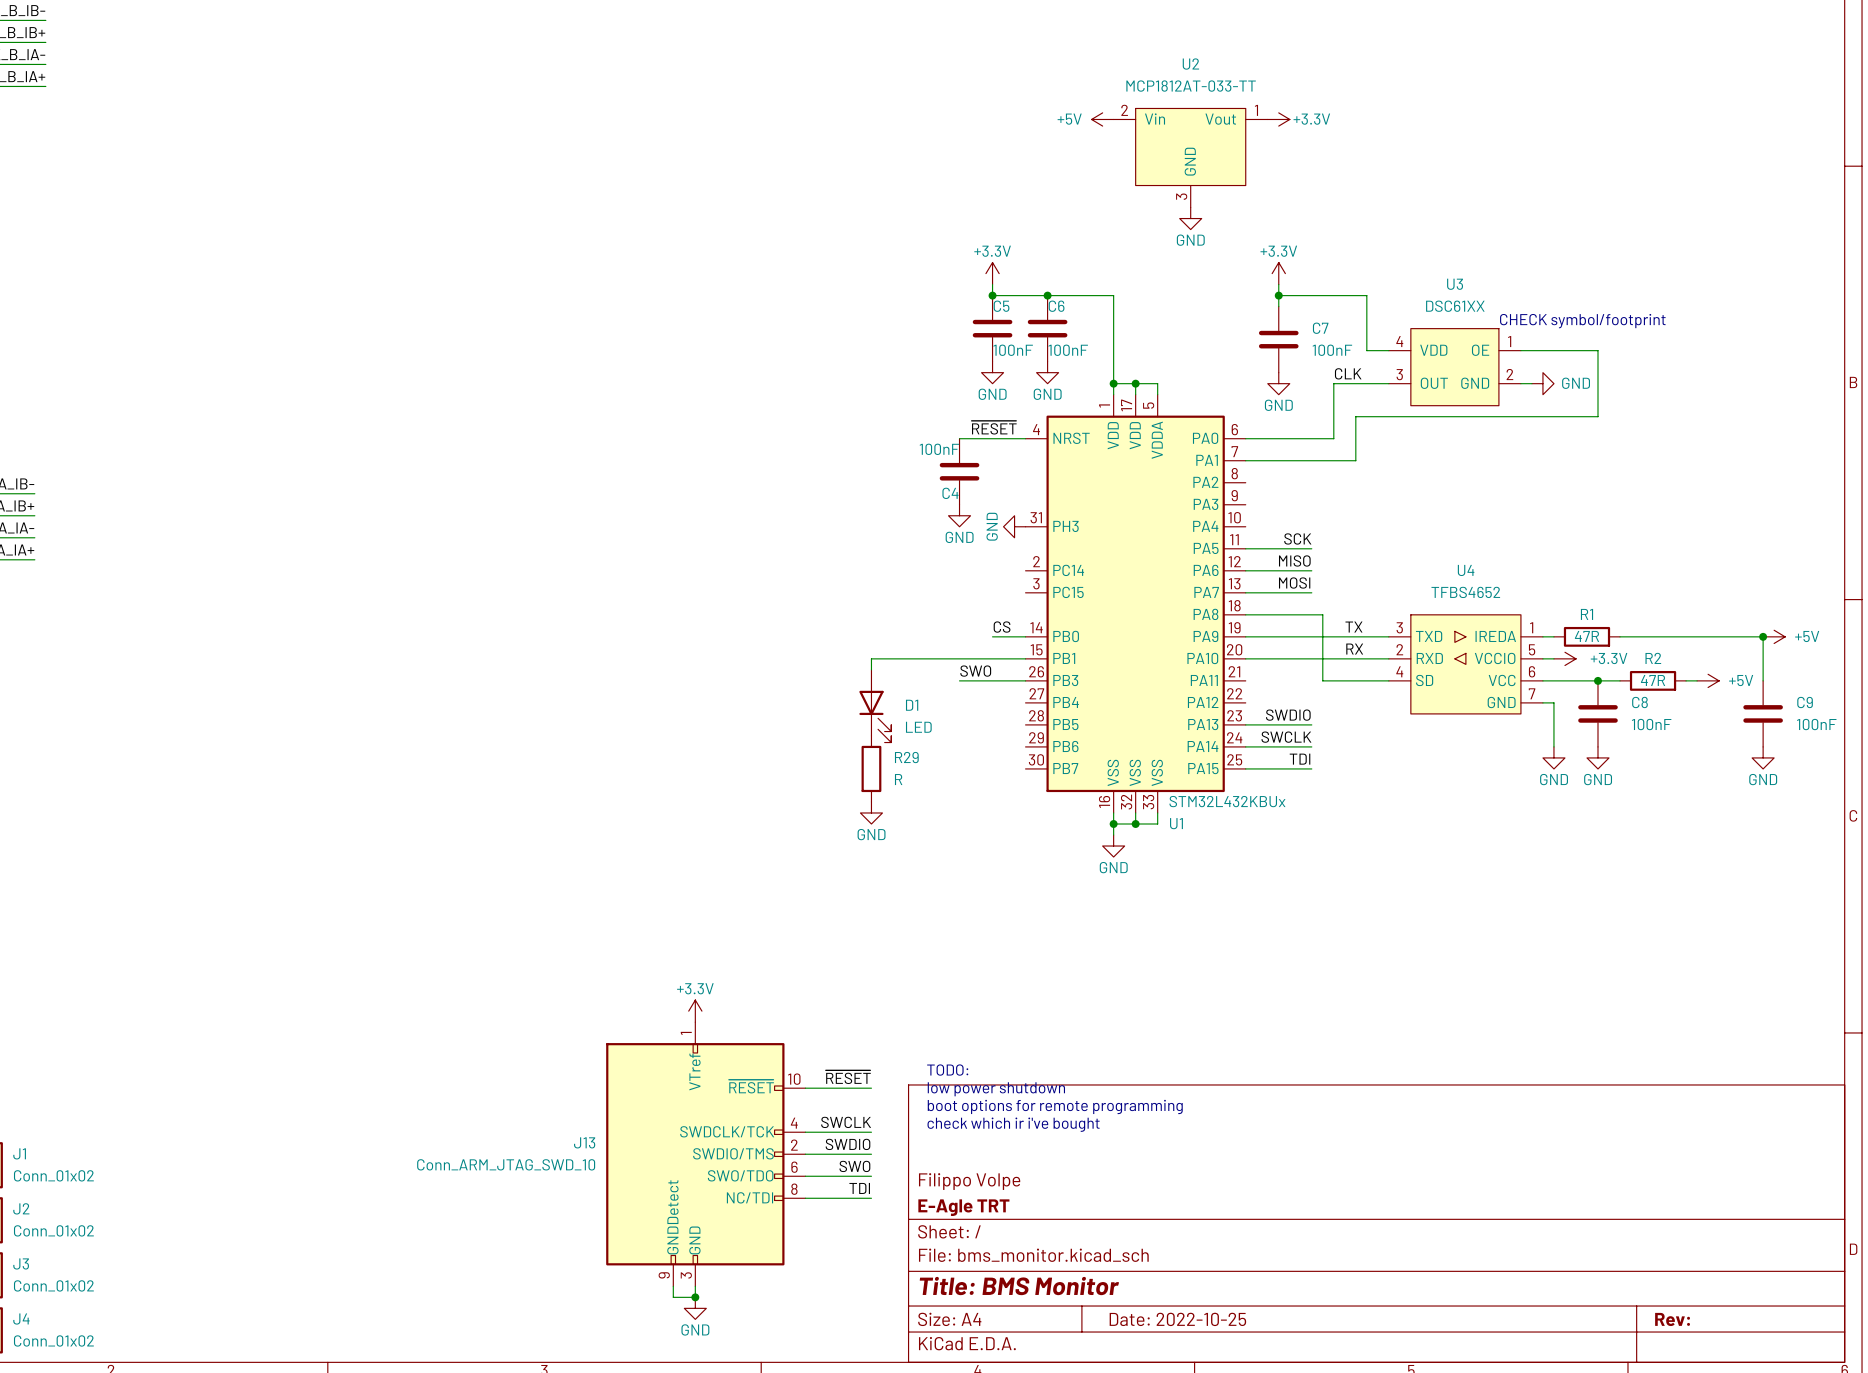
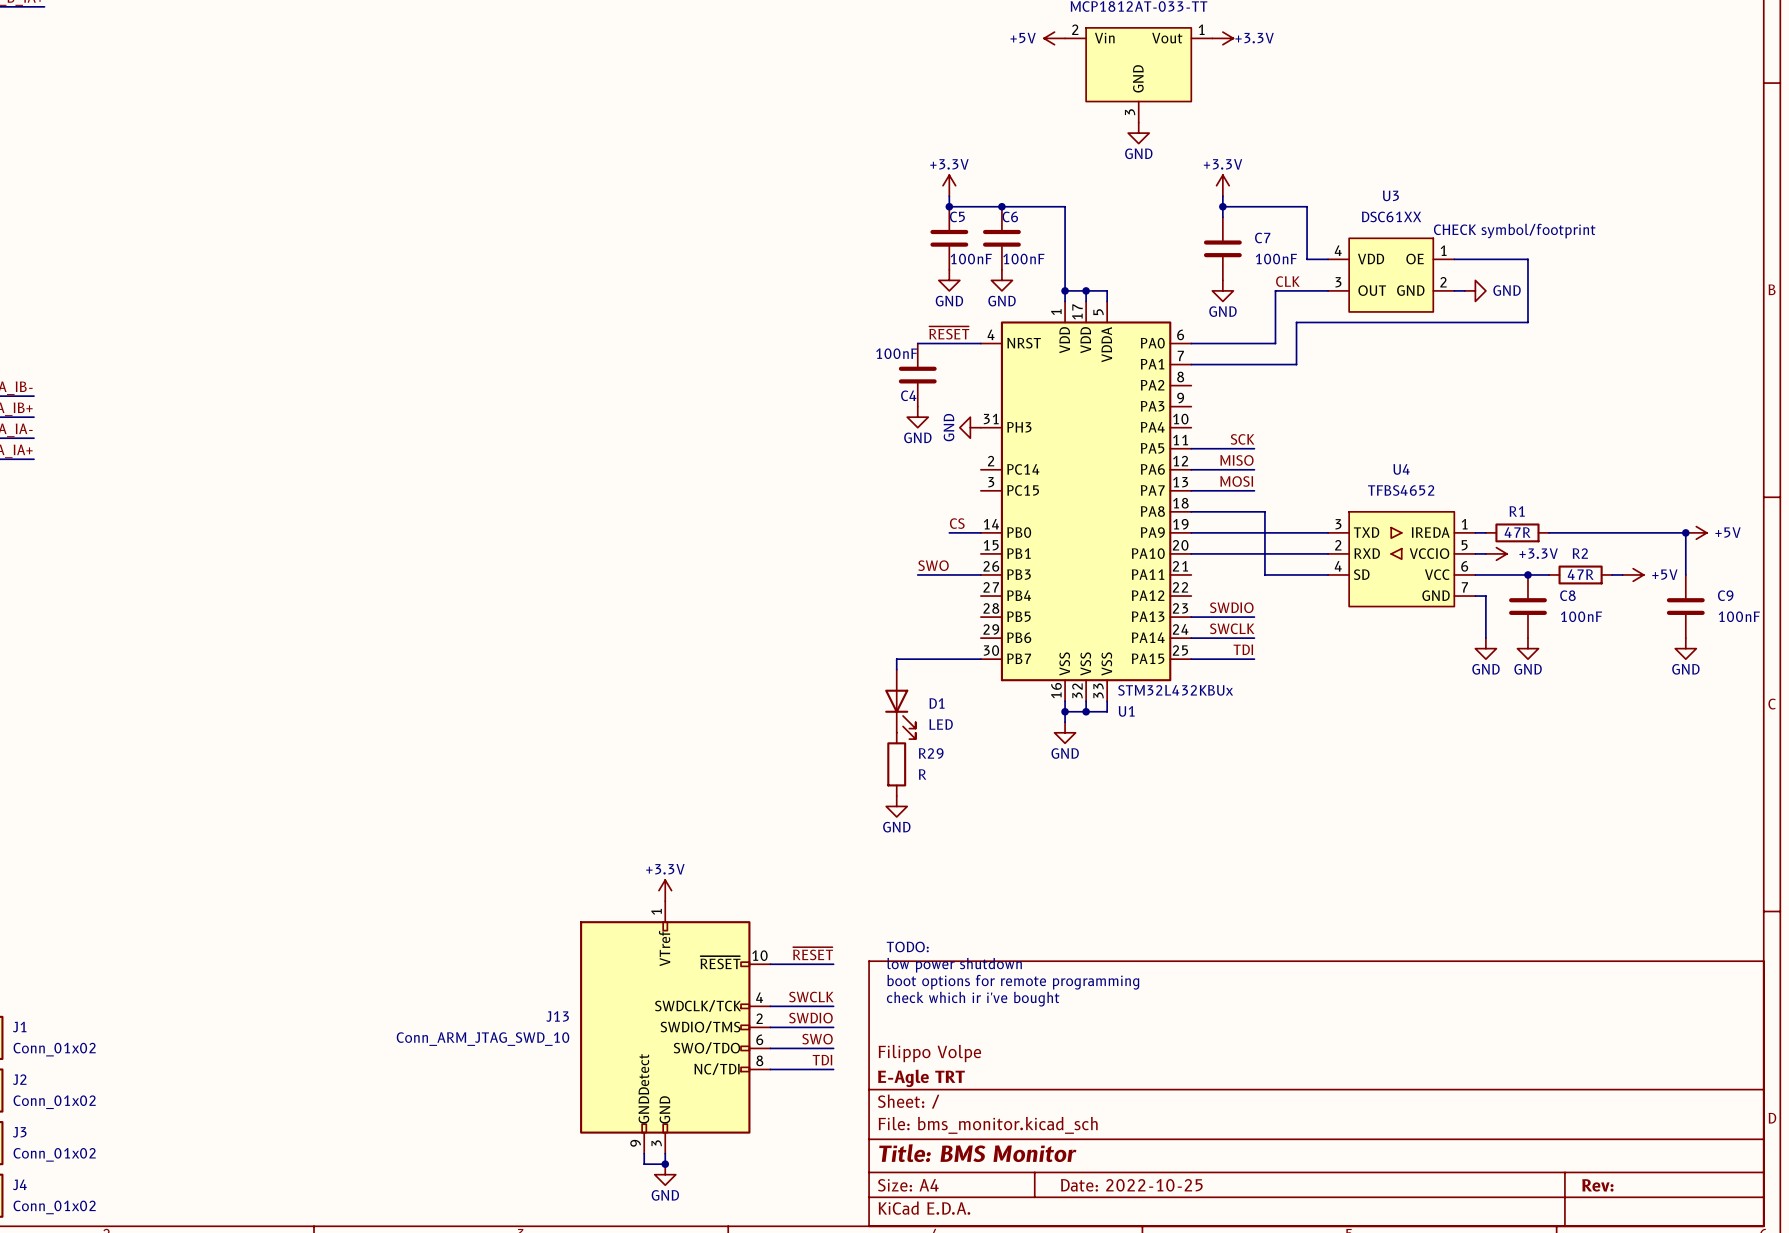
label: TX (1353, 627) -> none
label: RX (1354, 649) -> none
wire: (1025, 658) (871, 658) (871, 669) -> none
D1 position: (875, 706) -> (900, 704)
R29 position: (871, 768) -> (896, 764)
wire: none -> (980, 659) (896, 659) (896, 669)
power symbol position: GND (871, 812) -> GND (896, 806)

